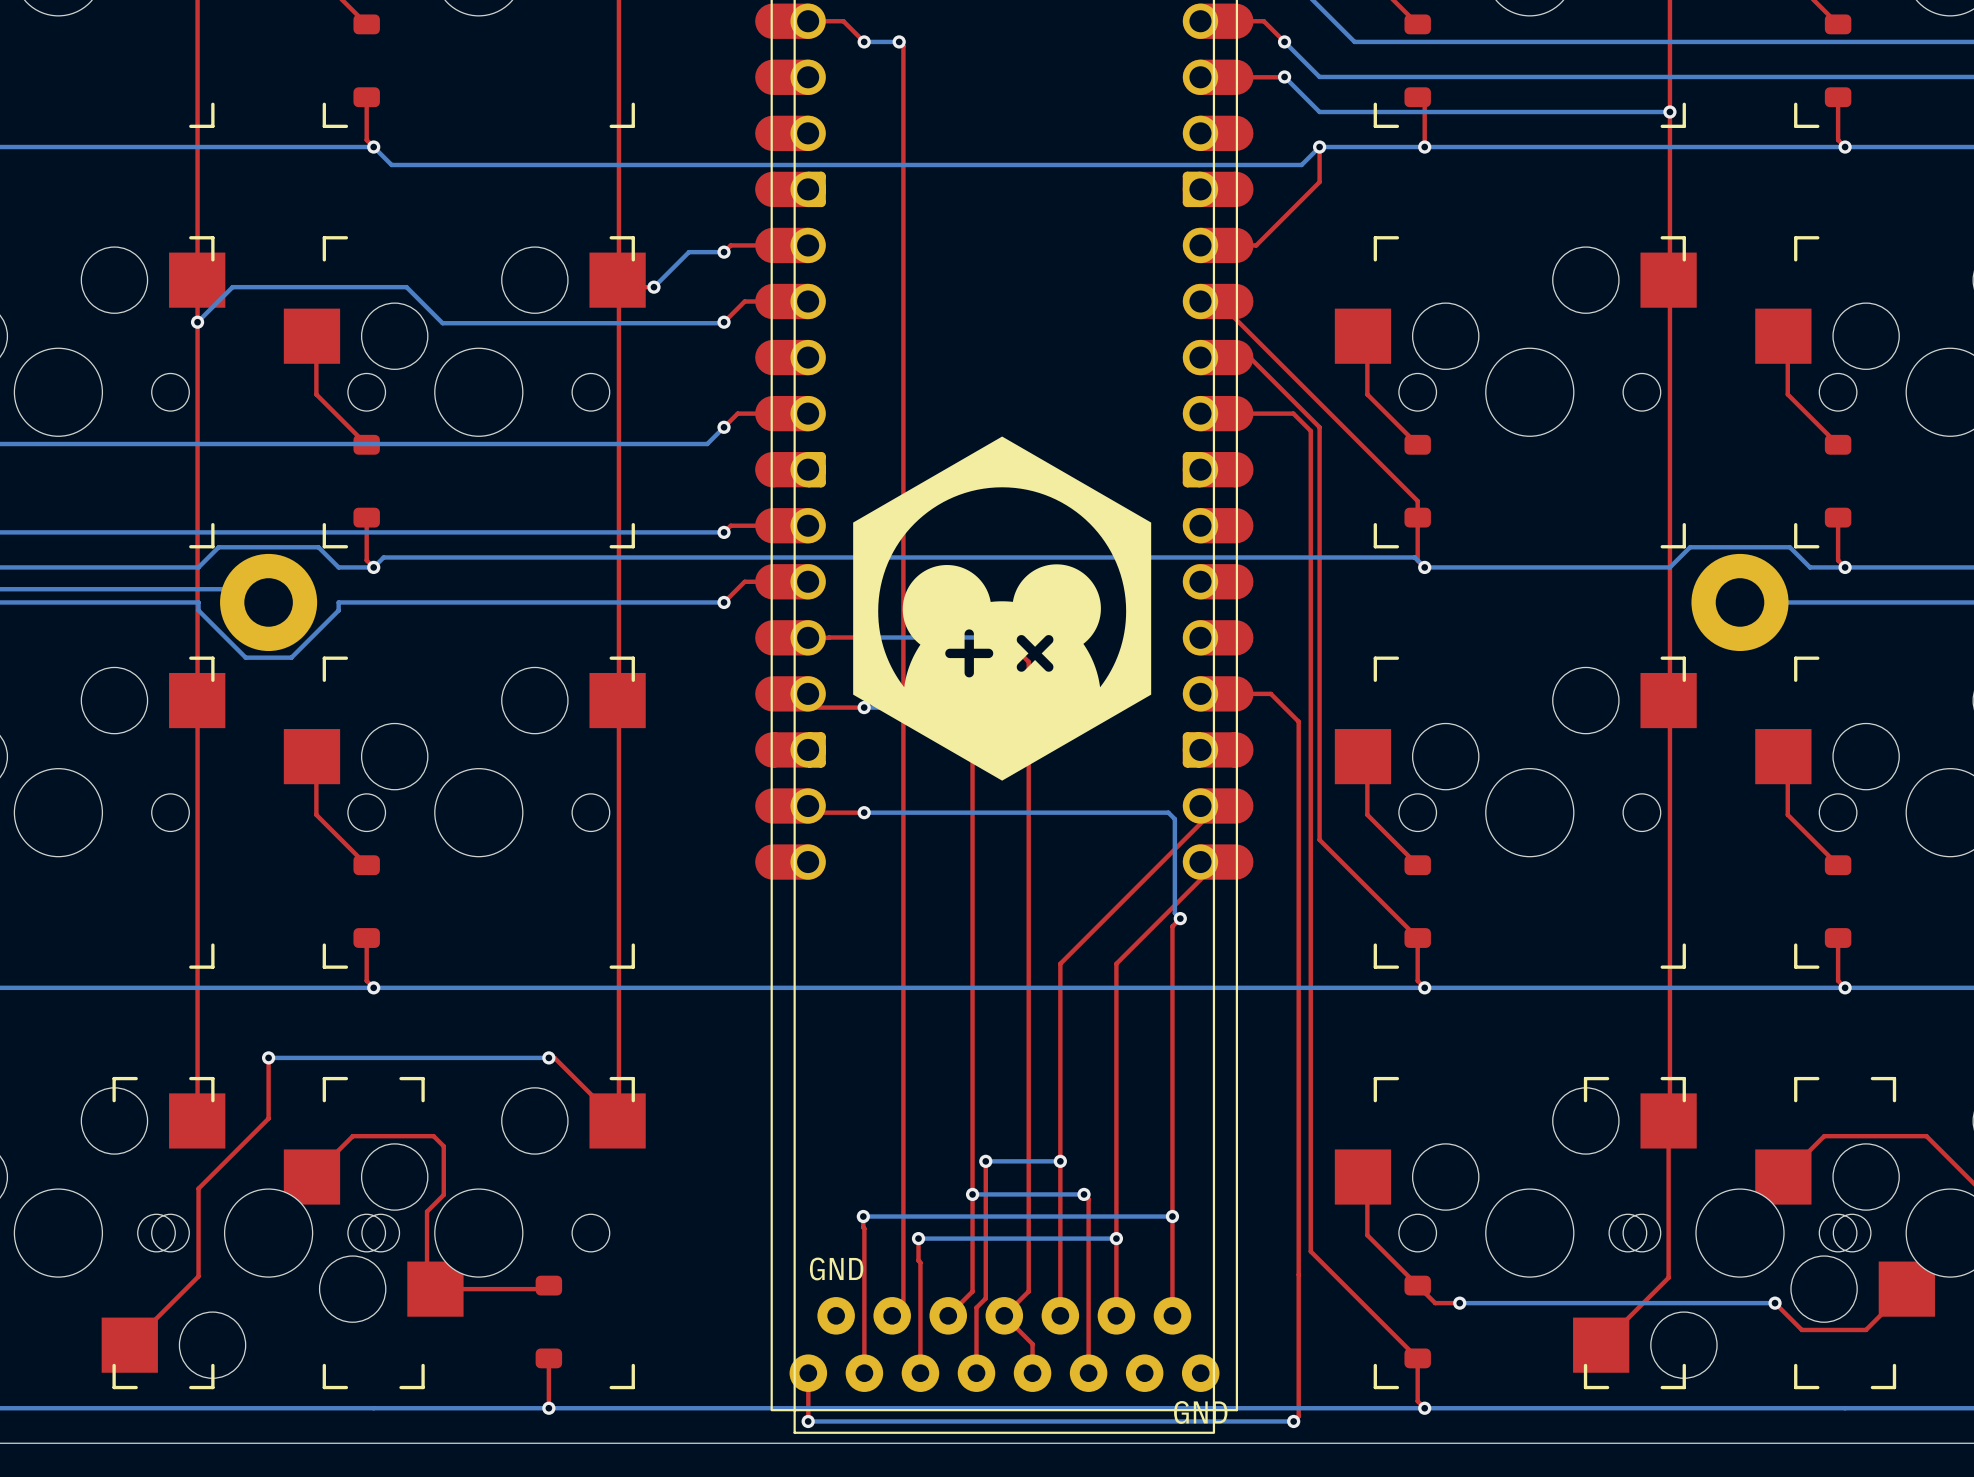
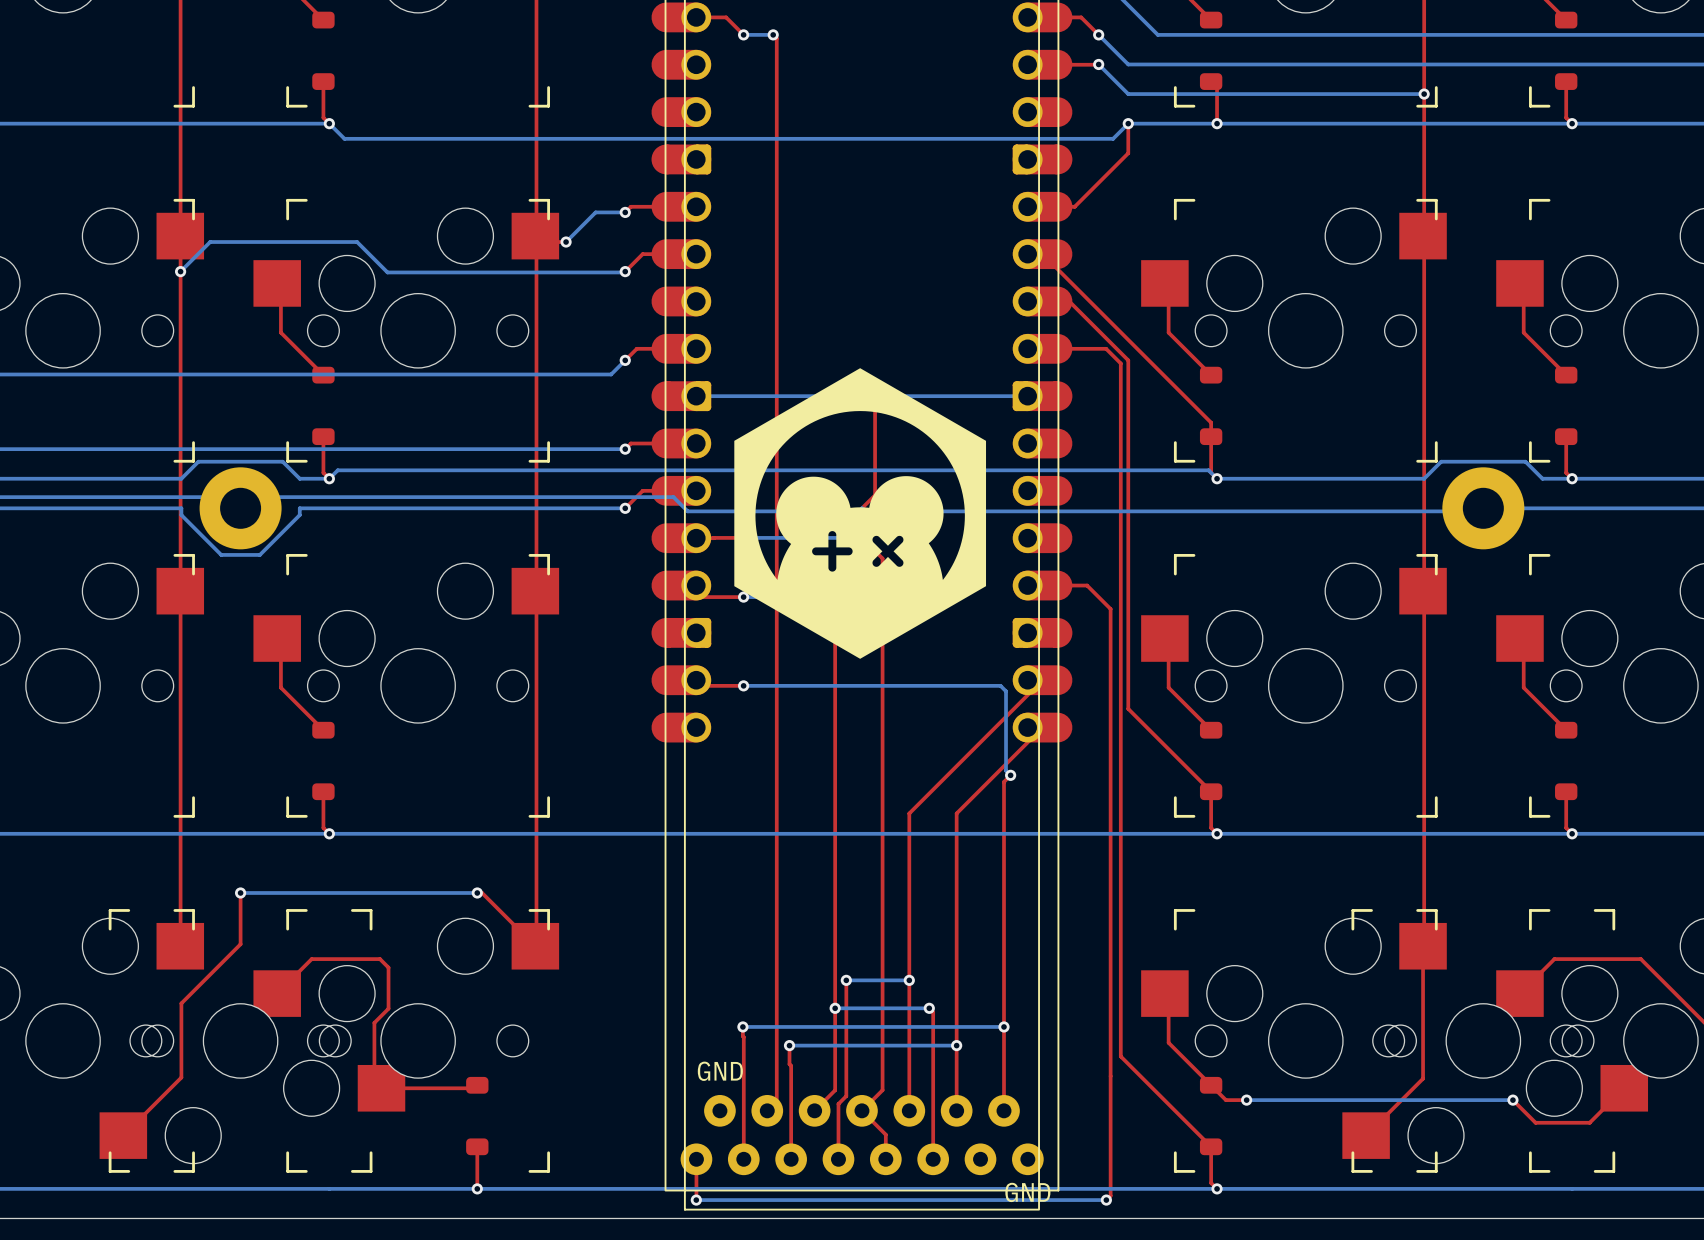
top track: none -> (875, 389) (875, 495) (861, 508)
bottom track: none -> (1027, 396) (881, 396) (875, 389) (861, 389) (855, 396) (696, 396)
bottom track: none -> (1483, 508) (1480, 511) (865, 511) (861, 508) (858, 511) (687, 511) (673, 497) (251, 497) (240, 508)

